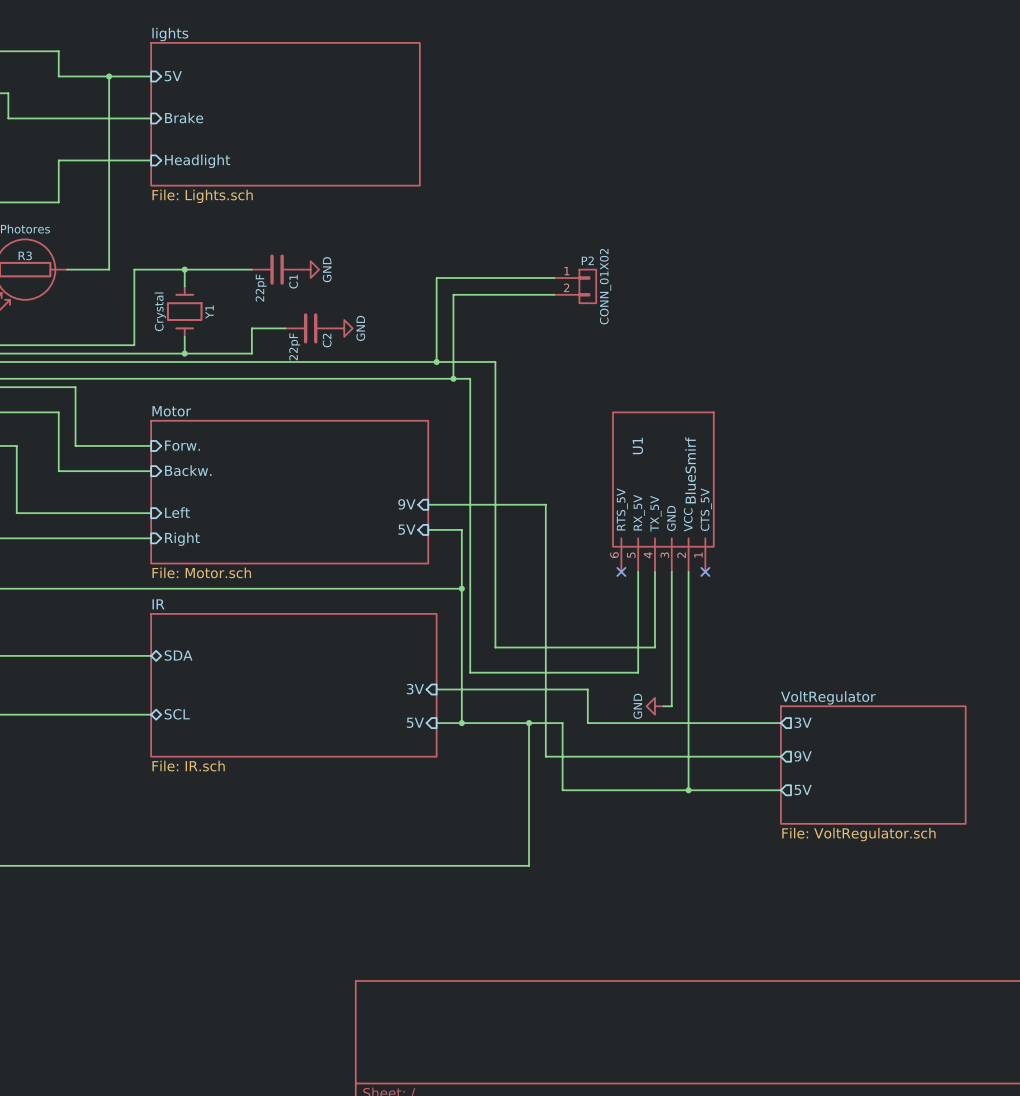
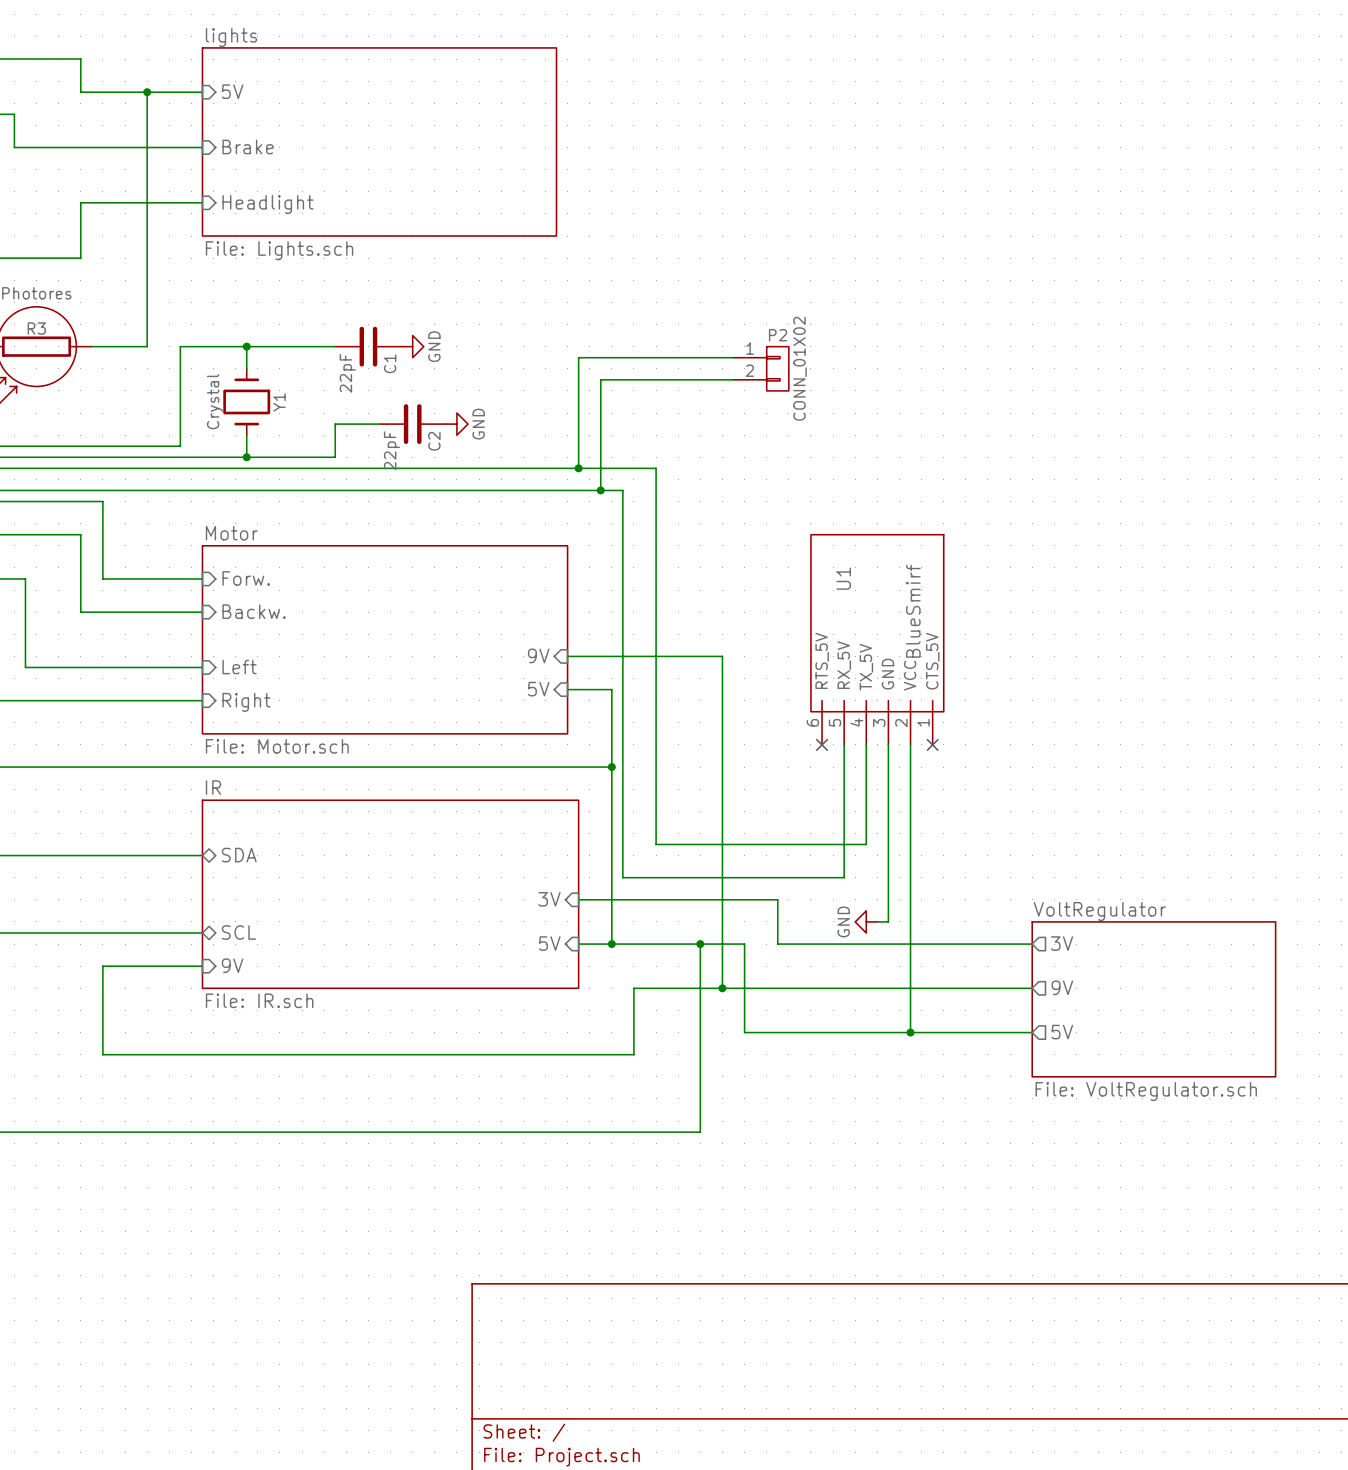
wire: none -> (202, 966) (102, 966) (102, 1054) (633, 1054) (633, 988) (722, 988)
sheet pin: none -> 9V (232, 965)
junction: none -> (722, 988)

